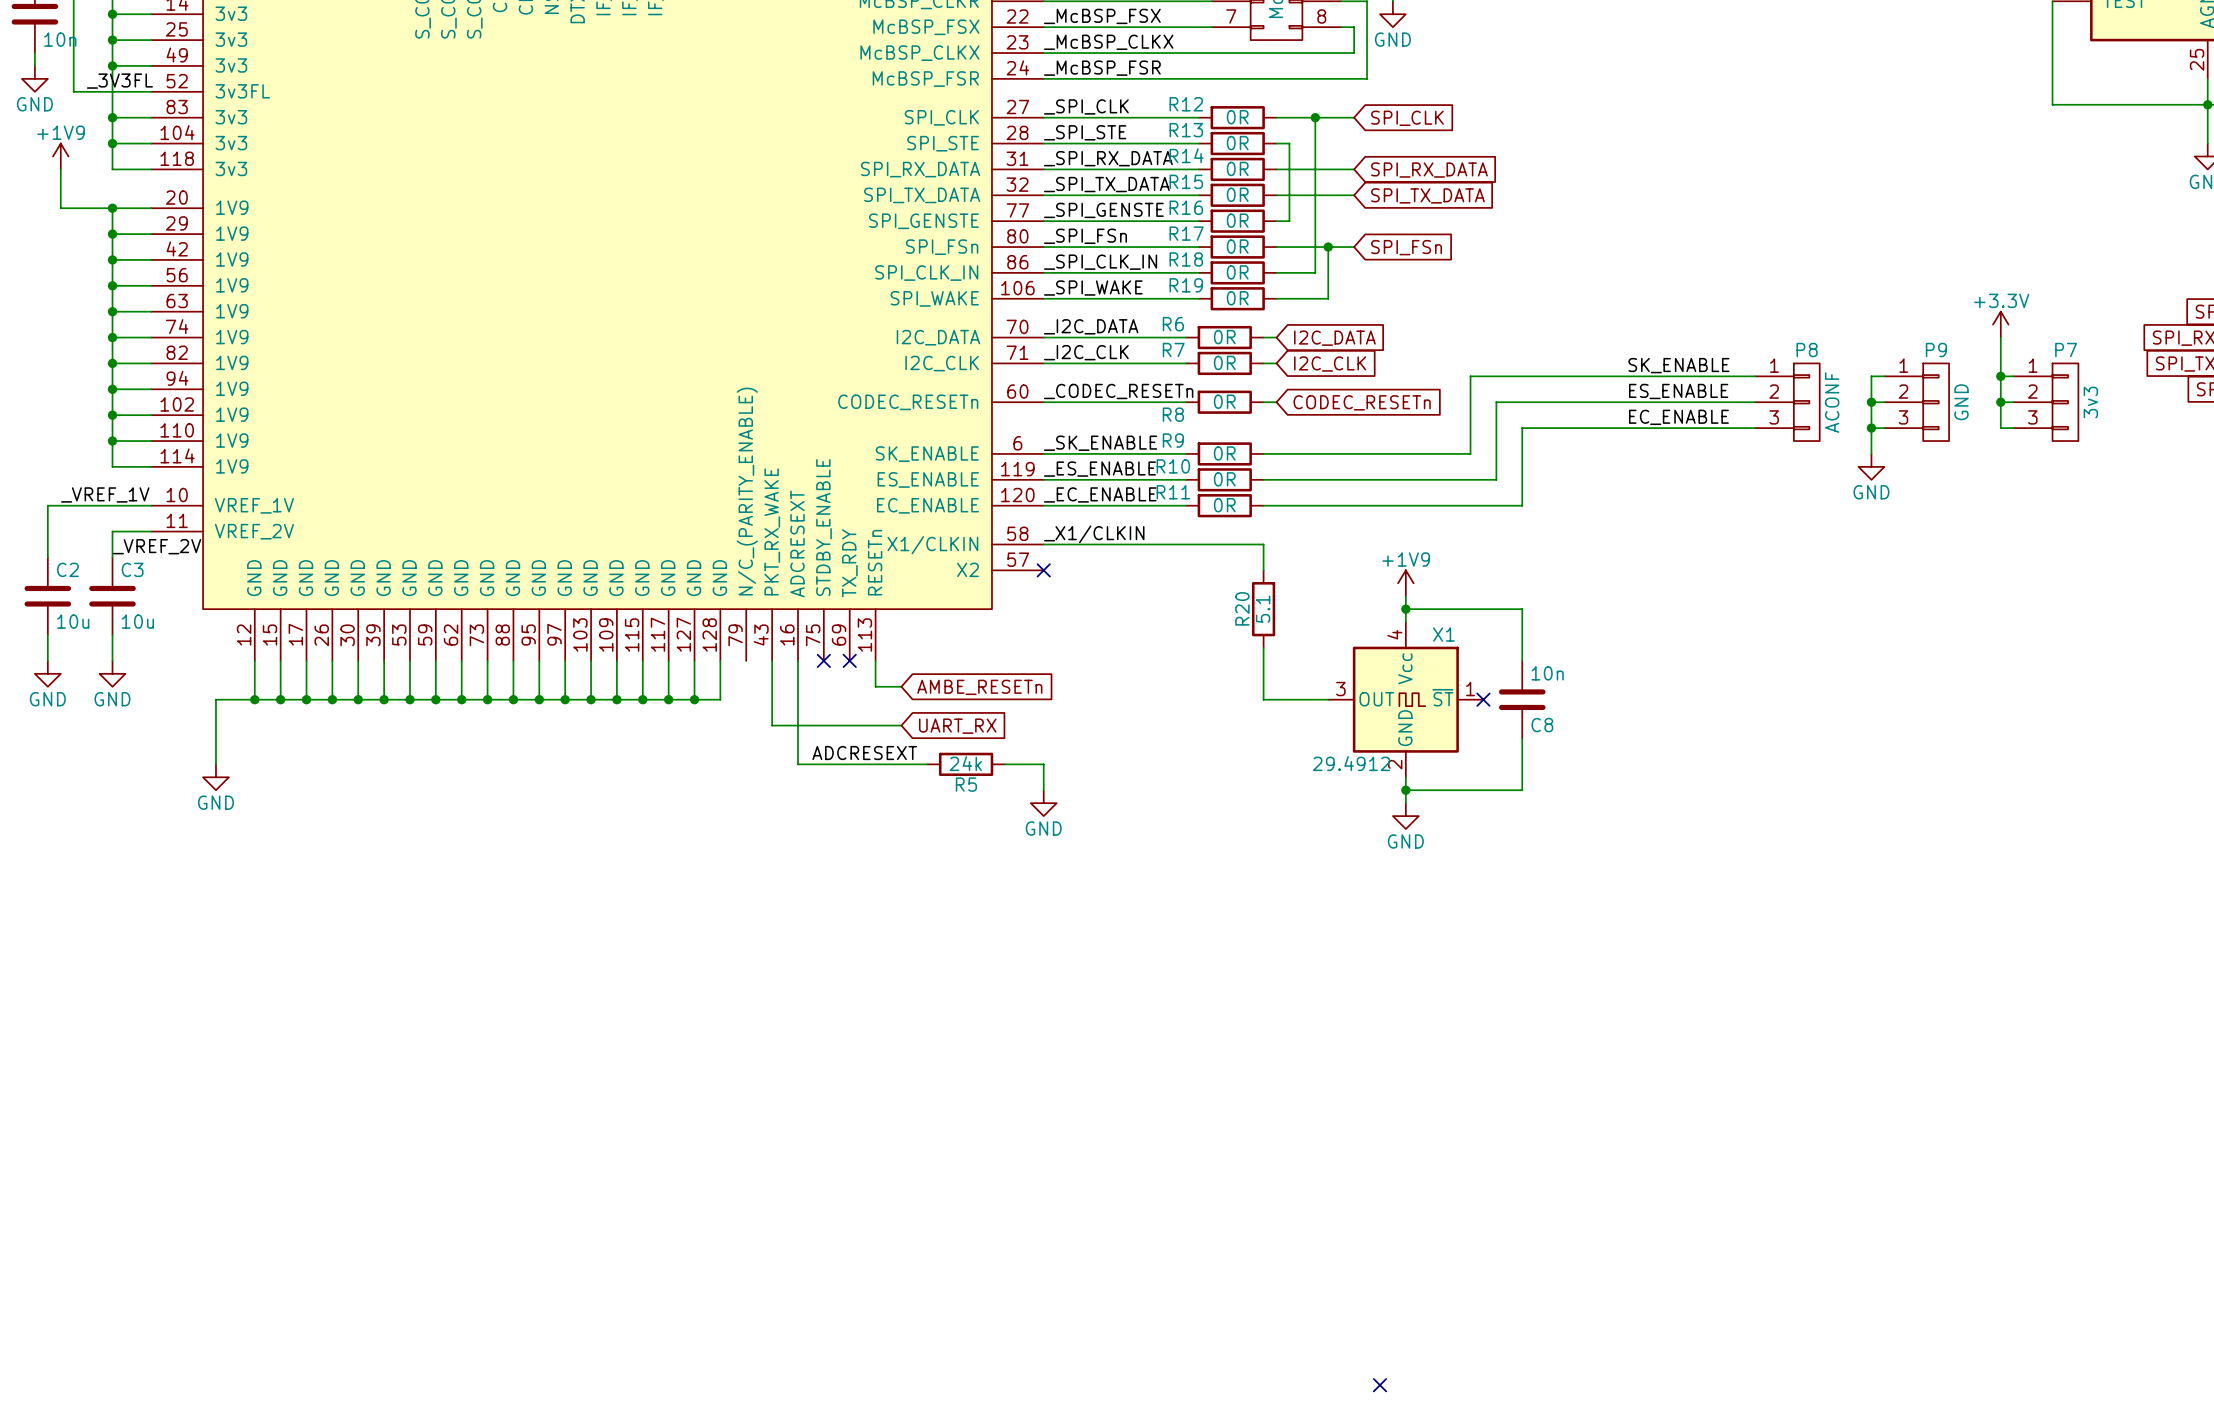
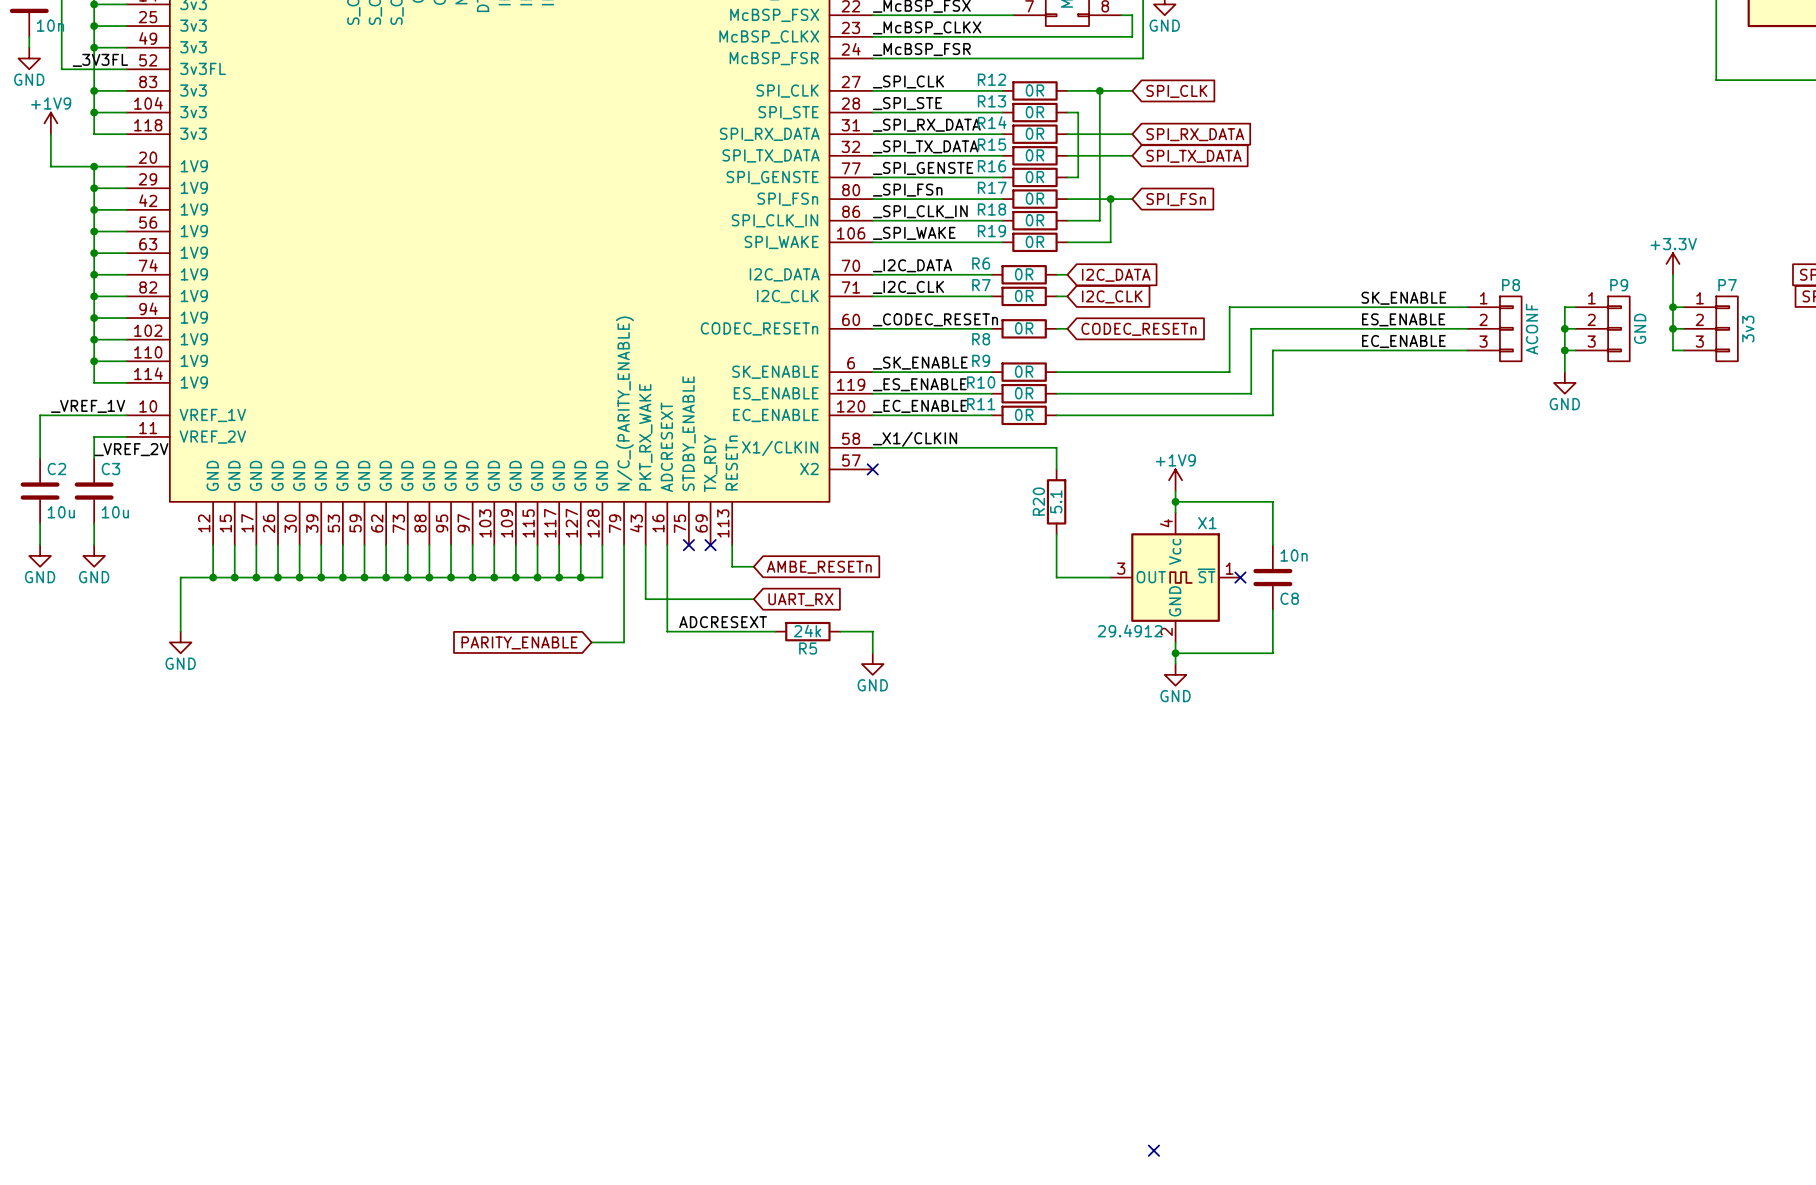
wire: none -> (624, 545) (624, 642) (591, 642)
global label: none -> PARITY_ENABLE (519, 642)

